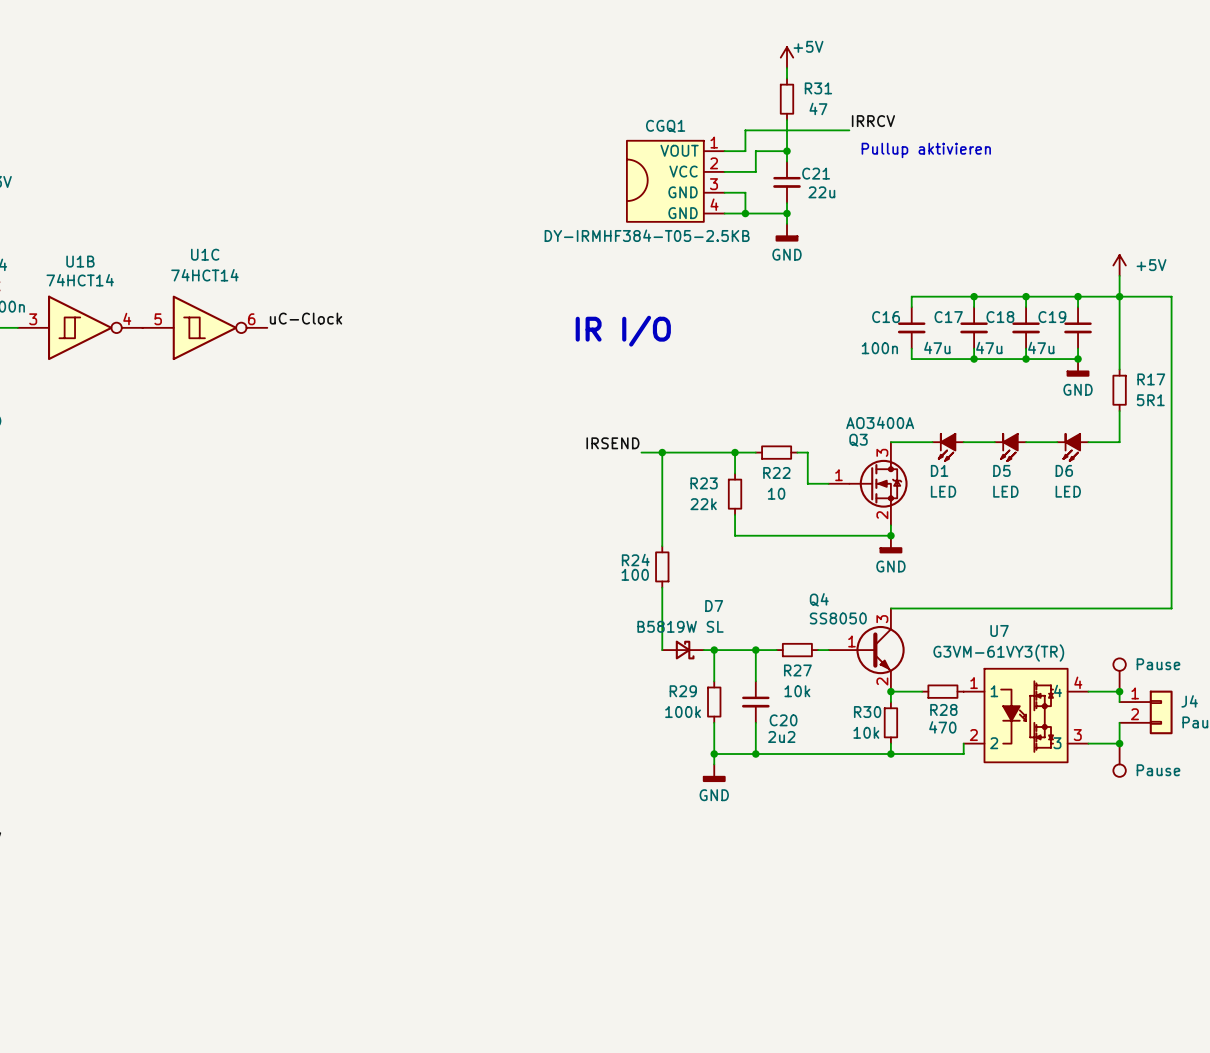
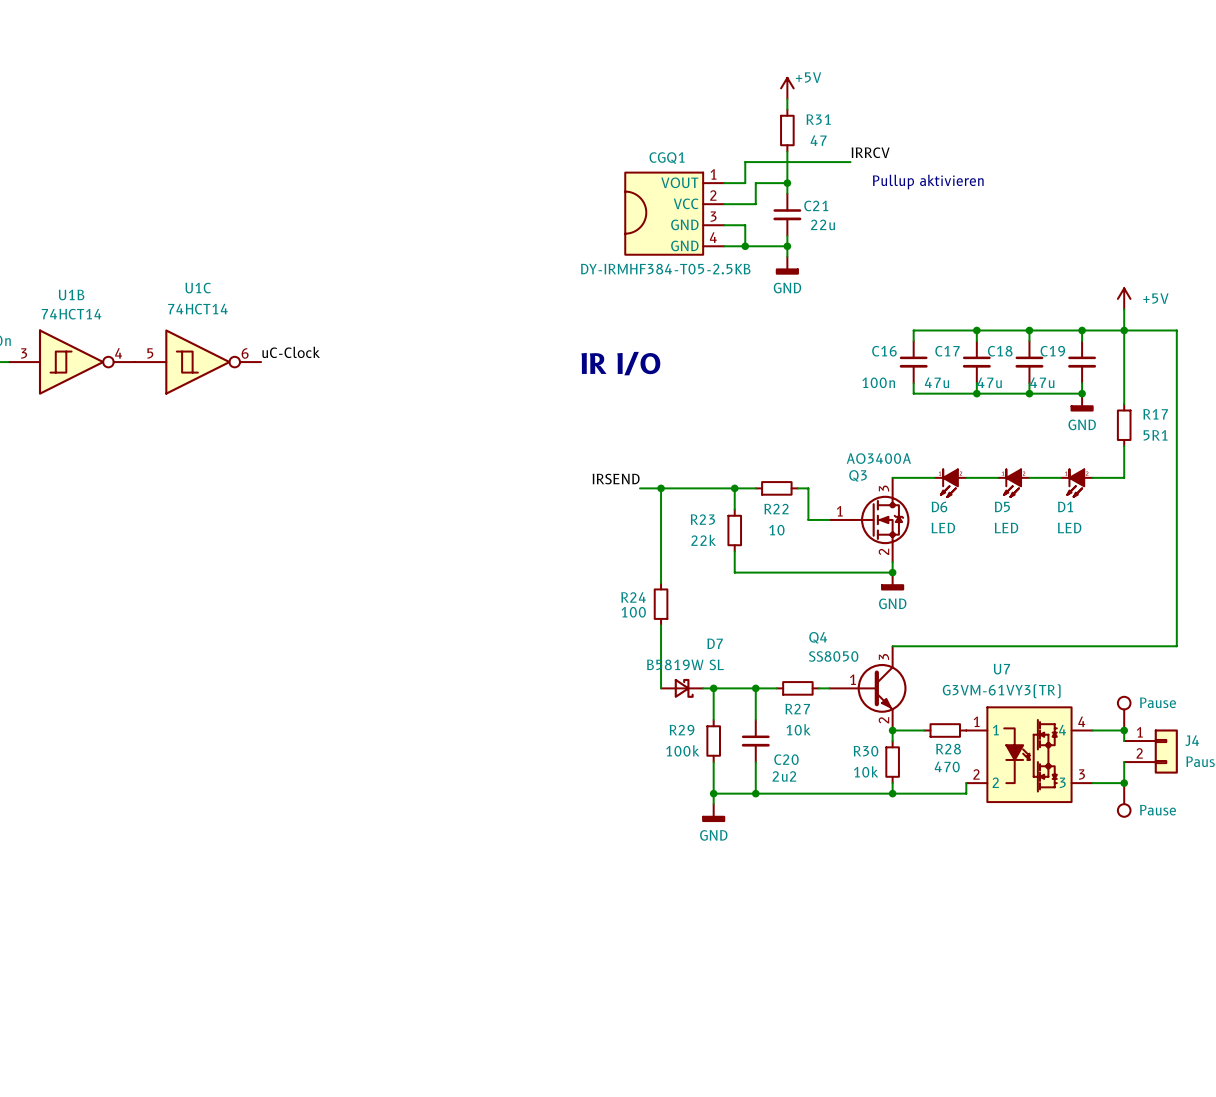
D1 symbol: [932, 433, 964, 461] -> [1061, 469, 1093, 497]
D5 symbol: [994, 433, 1027, 461] -> [997, 469, 1030, 497]
D6 symbol: [1057, 433, 1089, 461] -> [934, 469, 967, 497]

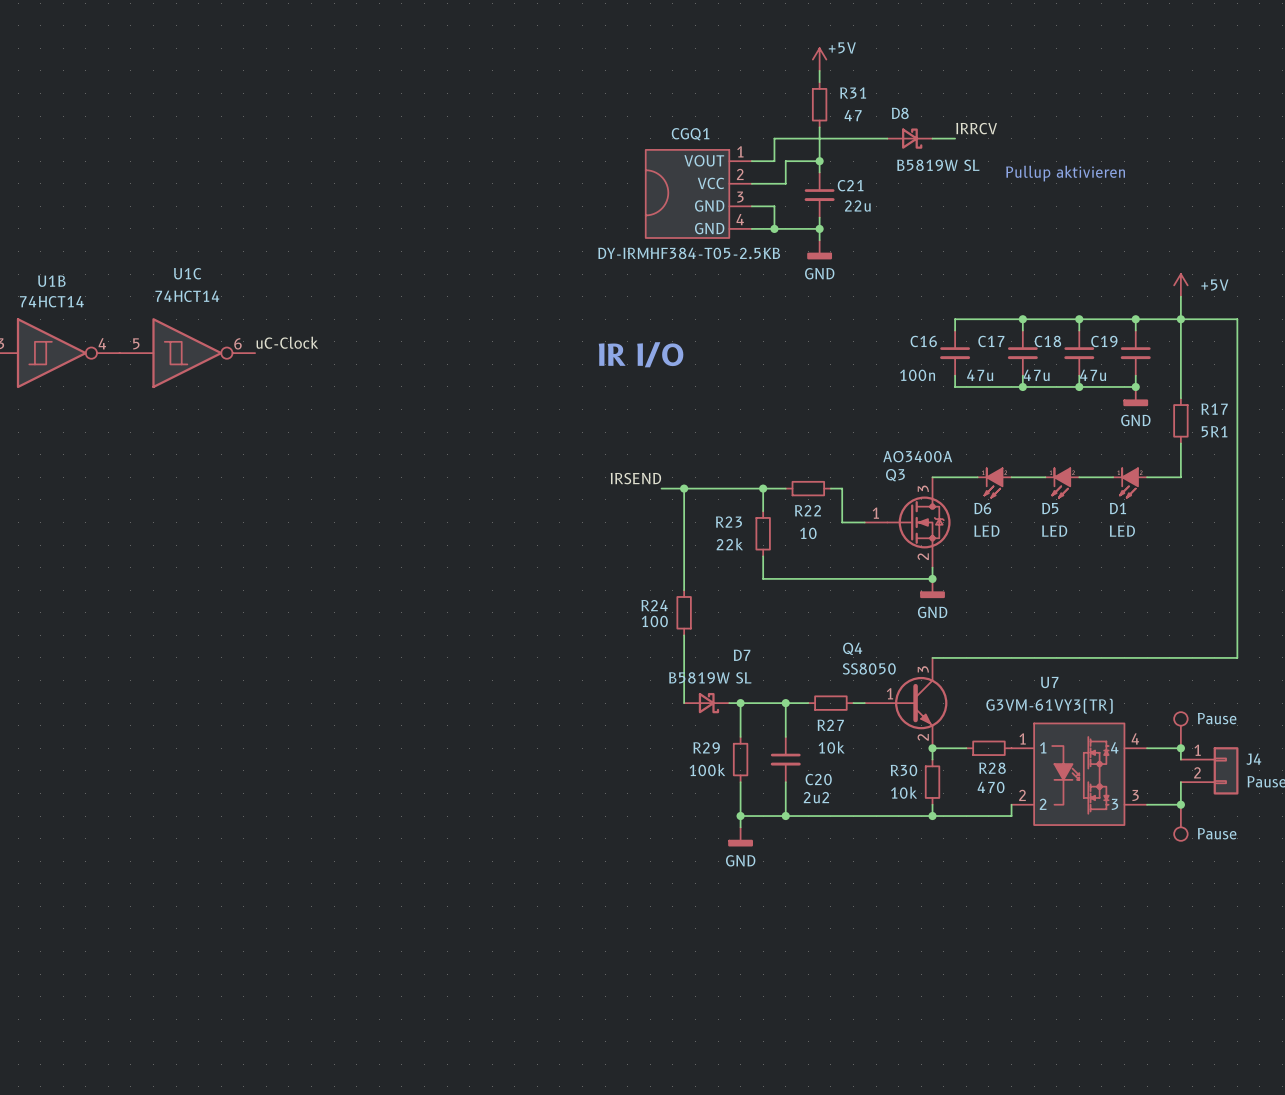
label position: IRRCV (870, 152) -> IRRCV (976, 128)
D8: none -> B5819W SL (909, 138)
wire: none -> (932, 138) (955, 138)
text position: Pullup aktivieren (928, 182) -> Pullup aktivieren (1065, 173)

